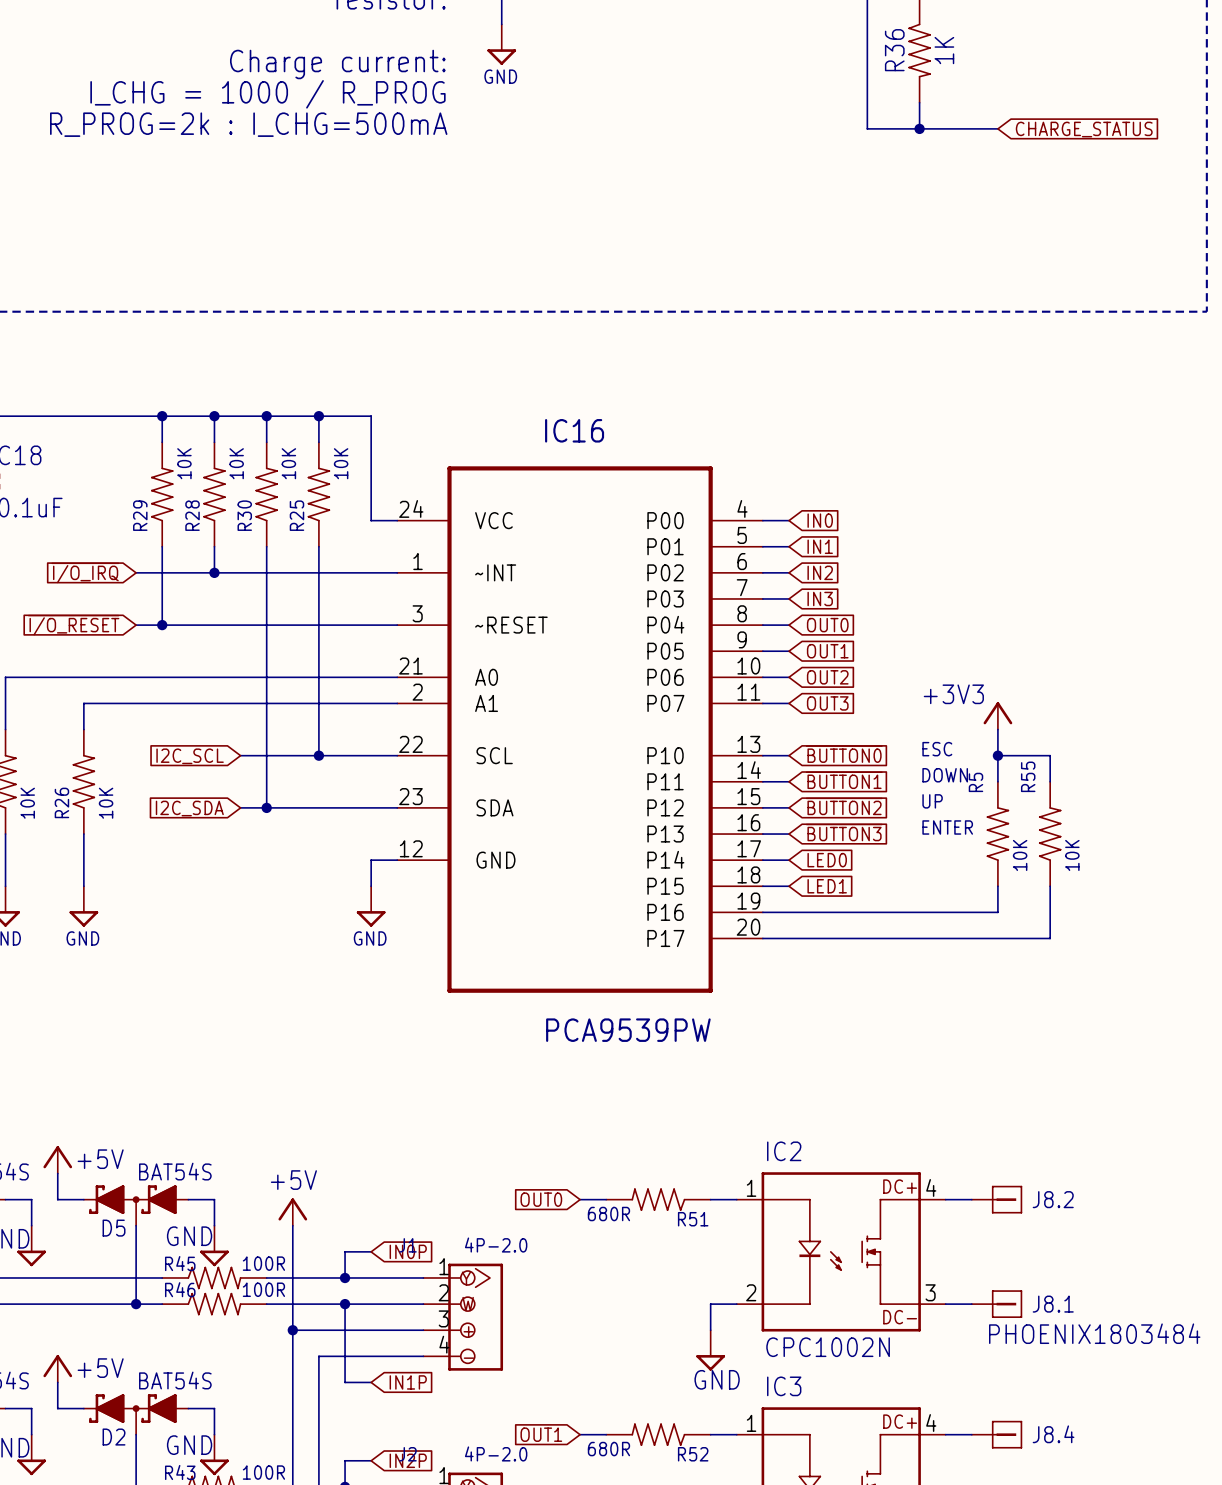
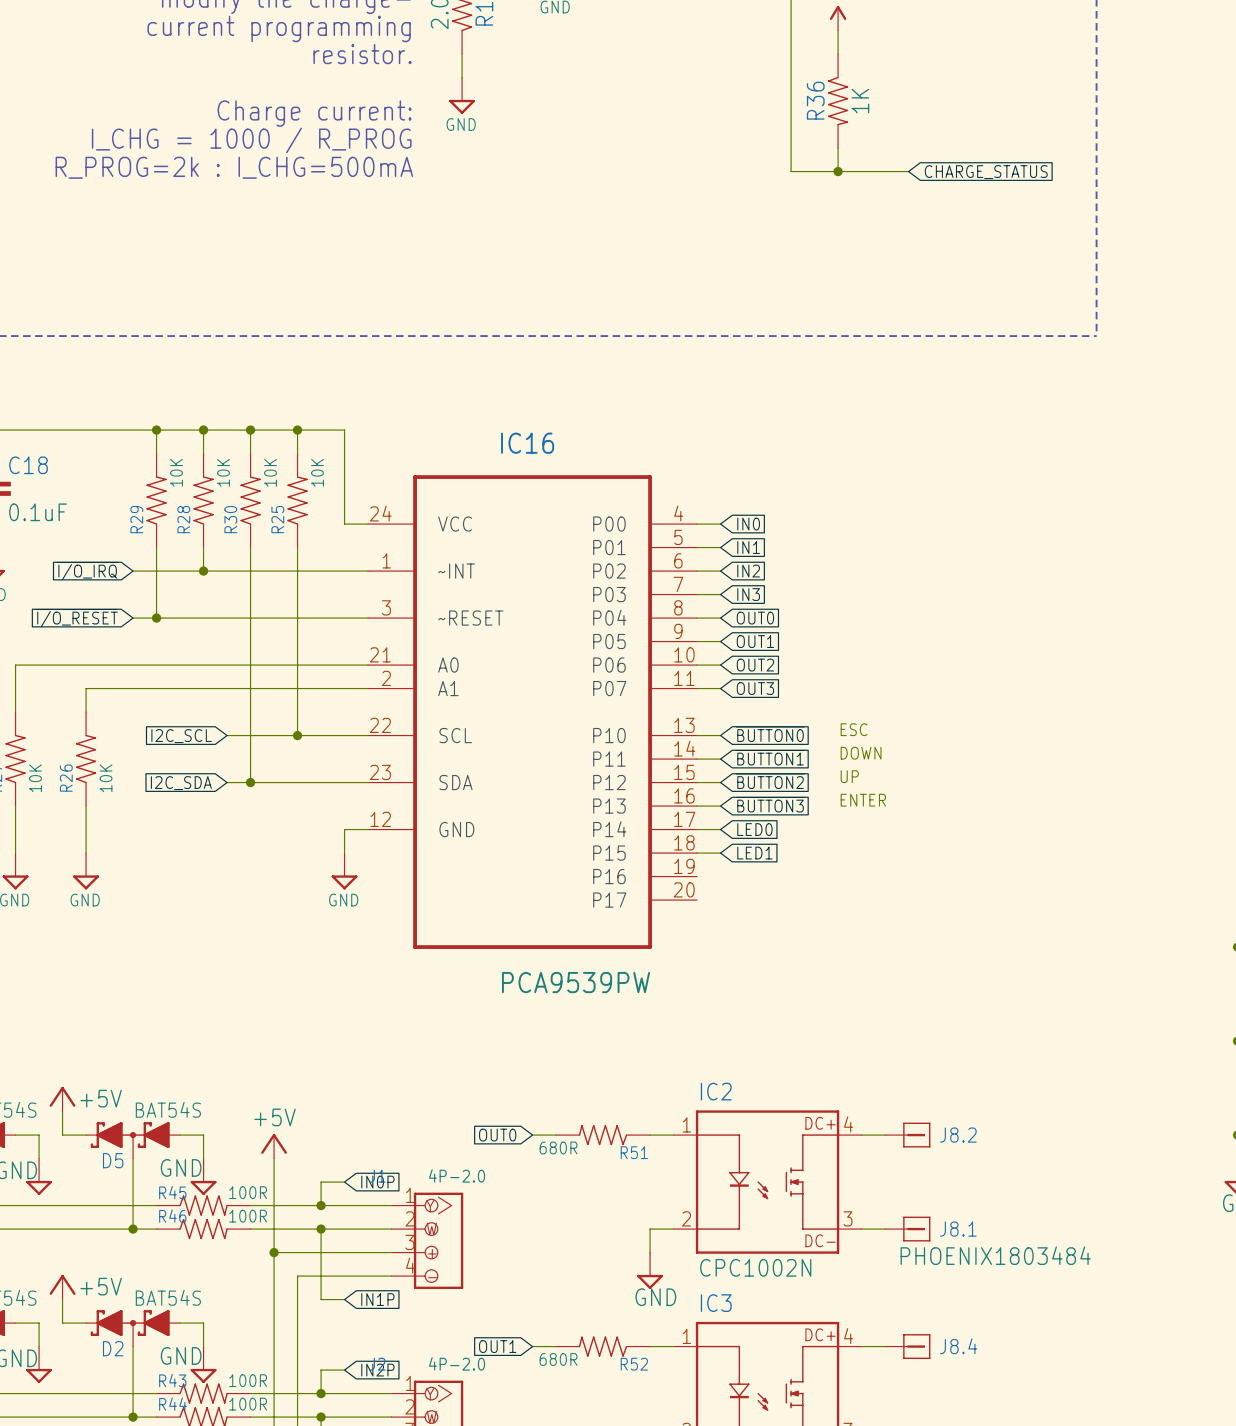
power symbol: +3V3 (997, 715) -> none
wire: (997, 729) (997, 781) -> none
wire: (997, 755) (1050, 755) (1050, 781) -> none
junction: (997, 755) -> none
R5: 10K (997, 834) -> none
R55: 10K (1050, 834) -> none
wire: (997, 886) (997, 912) (762, 912) -> none
wire: (1050, 886) (1050, 938) (762, 938) -> none

